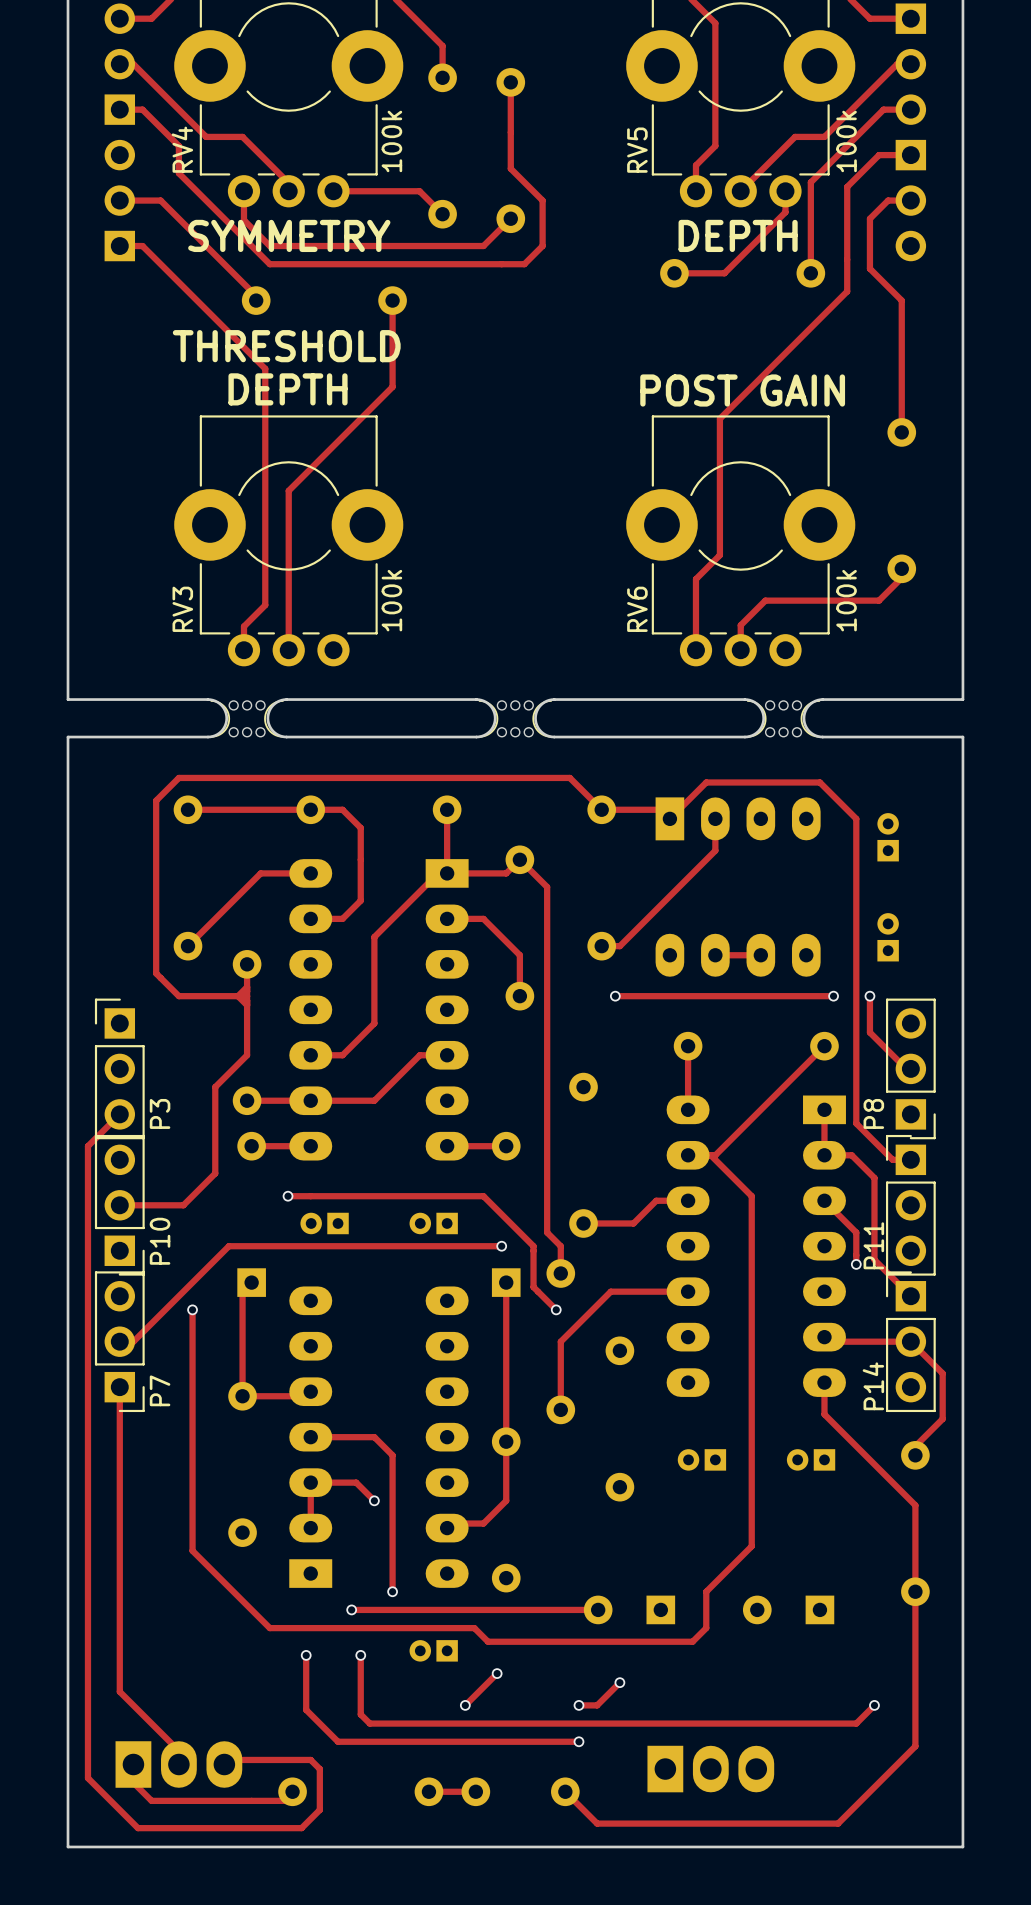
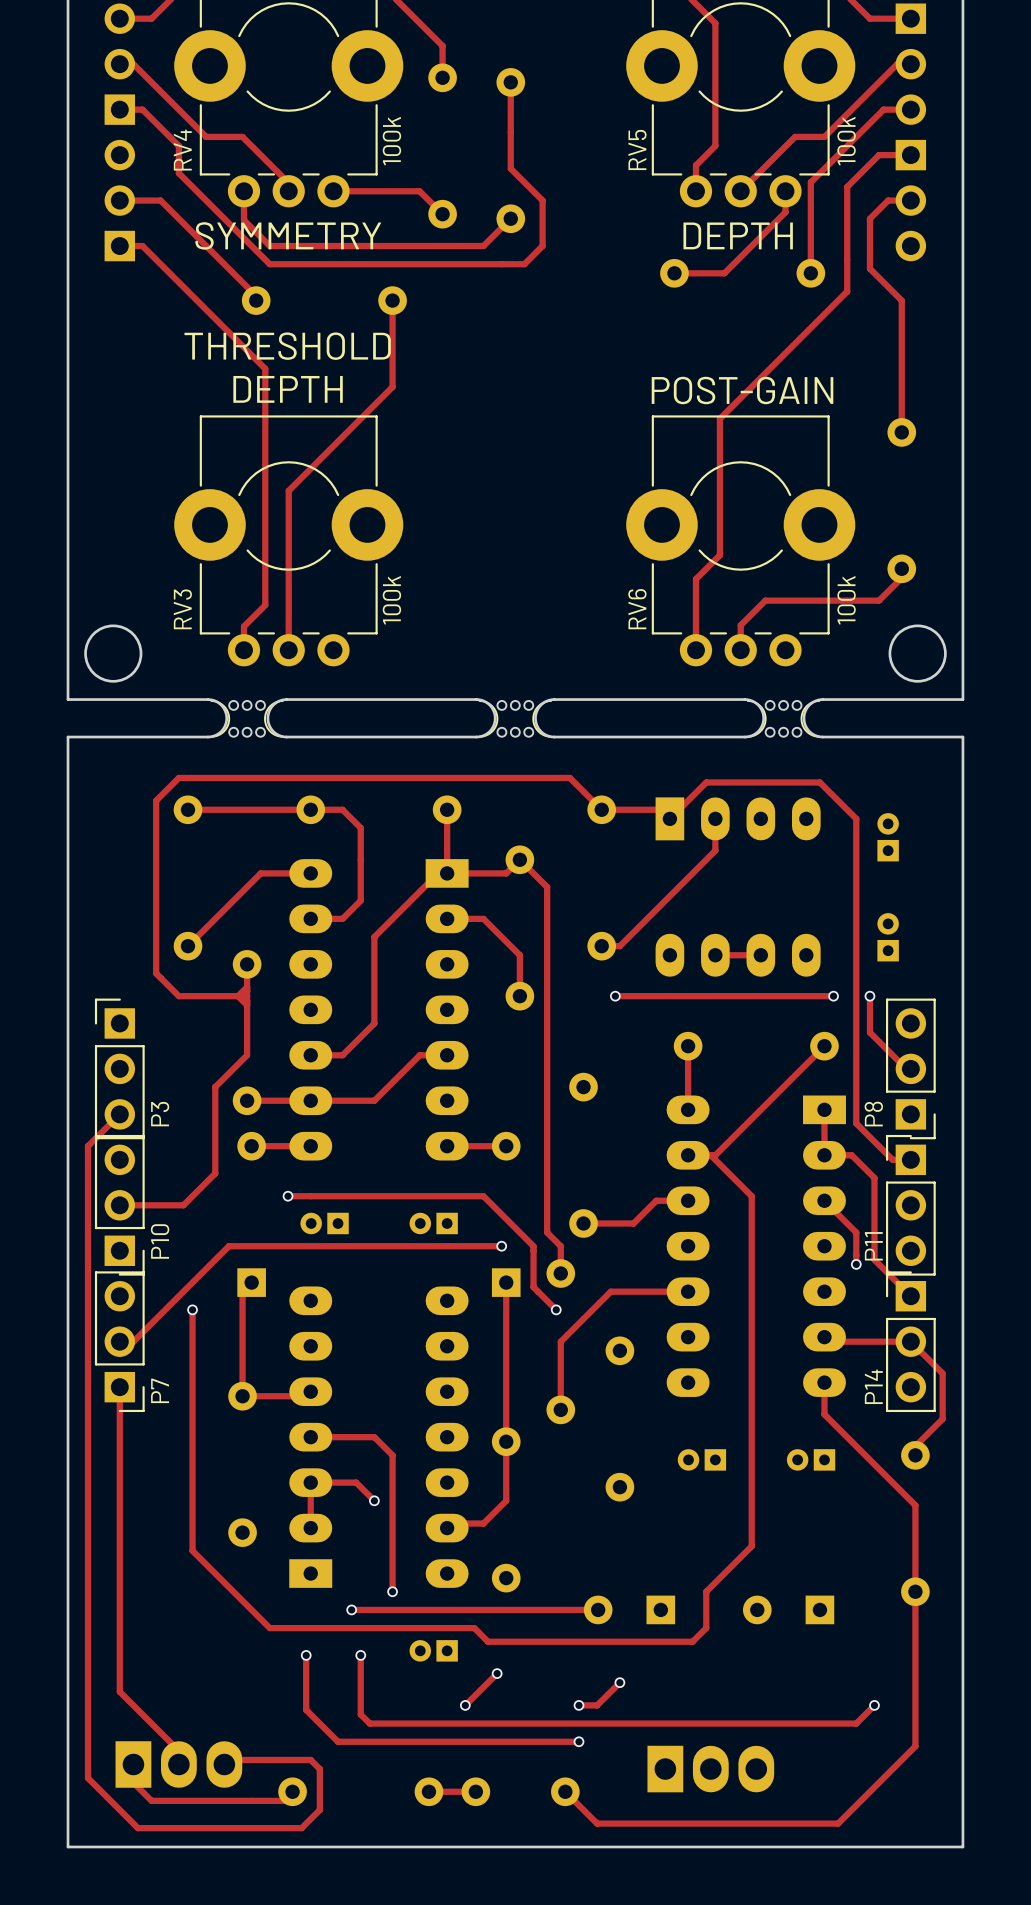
text: POST GAIN (742, 390) -> POST-GAIN (742, 390)
round board edge: none -> [84, 624, 143, 683]
round board edge: none -> [888, 624, 947, 683]

